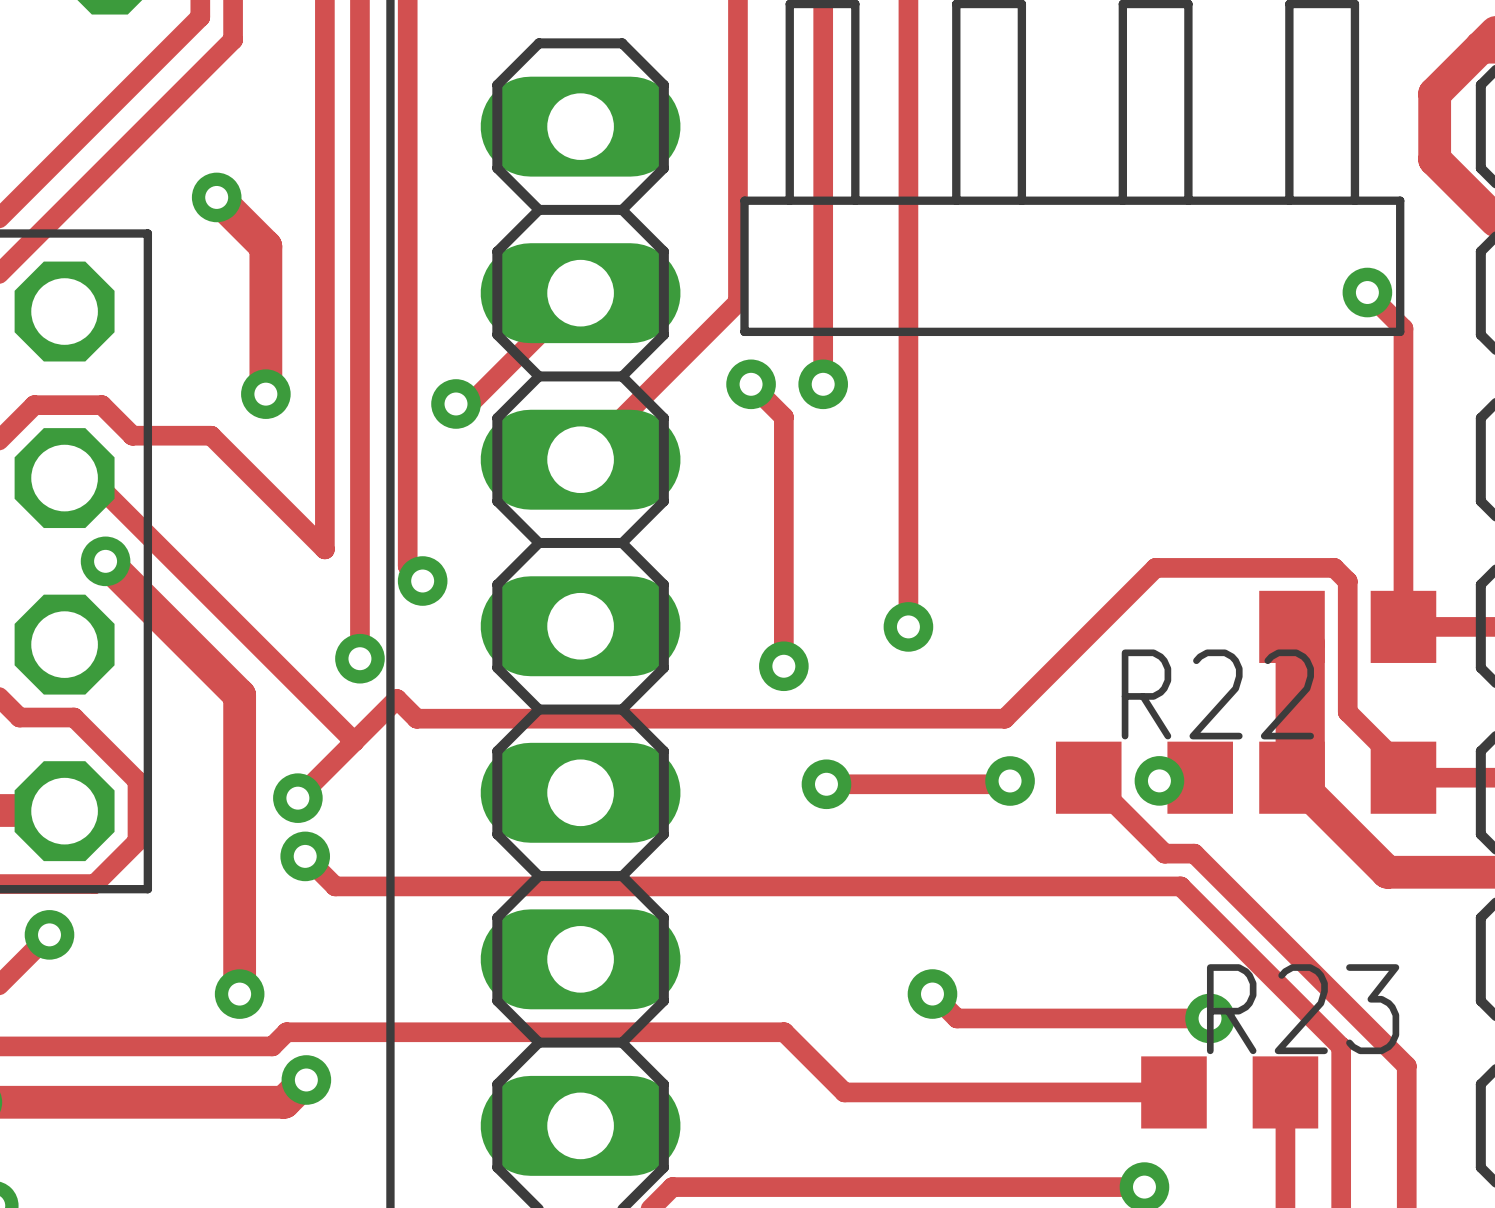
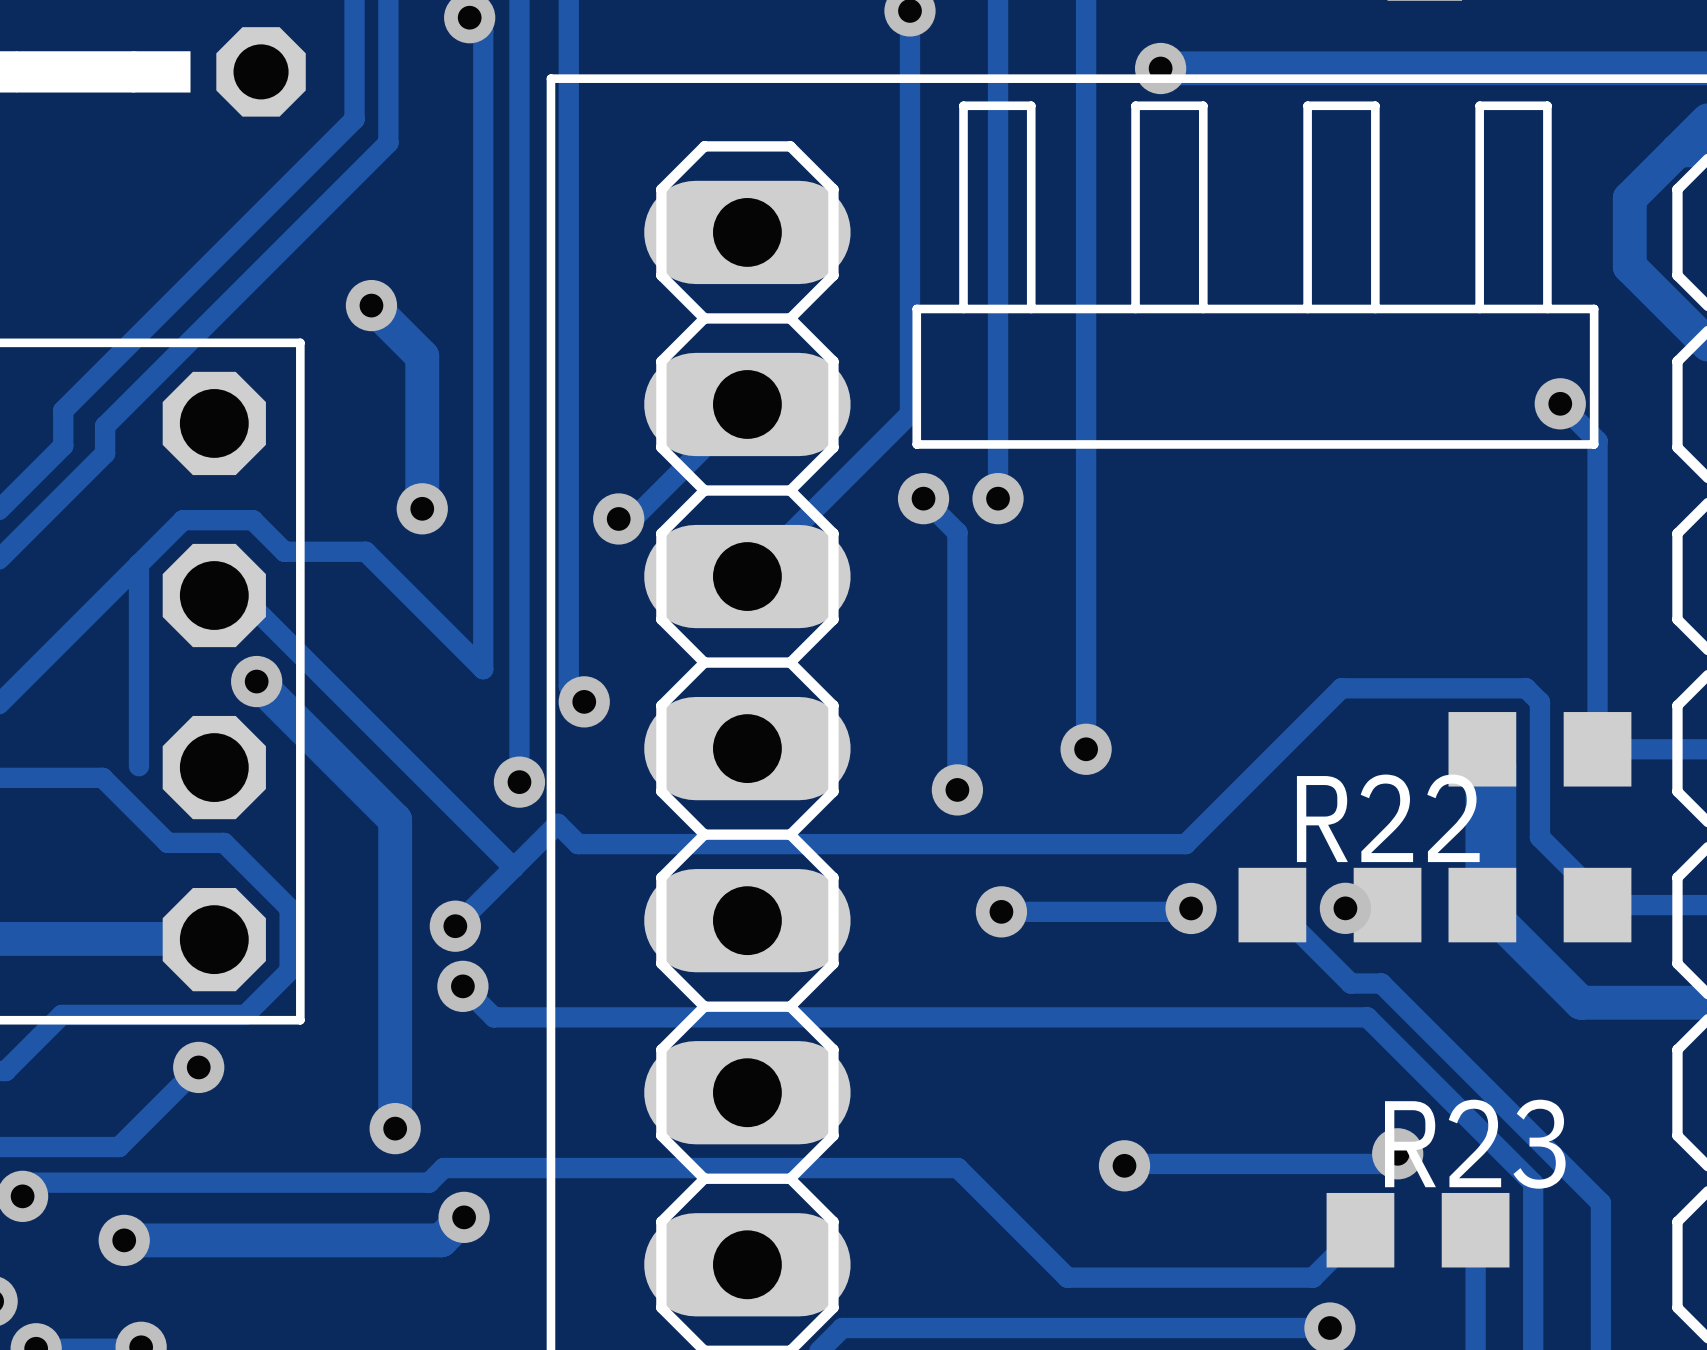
track: (932, 994) (956, 1018) (1210, 1018) -> (1124, 1165) (1126, 1163) (1387, 1163) (1397, 1153)
via position: (932, 994) -> (1124, 1165)
track: (844, 1092) (1173, 1092) -> (1020, 1230) (1067, 1277) (1313, 1277) (1360, 1230)

